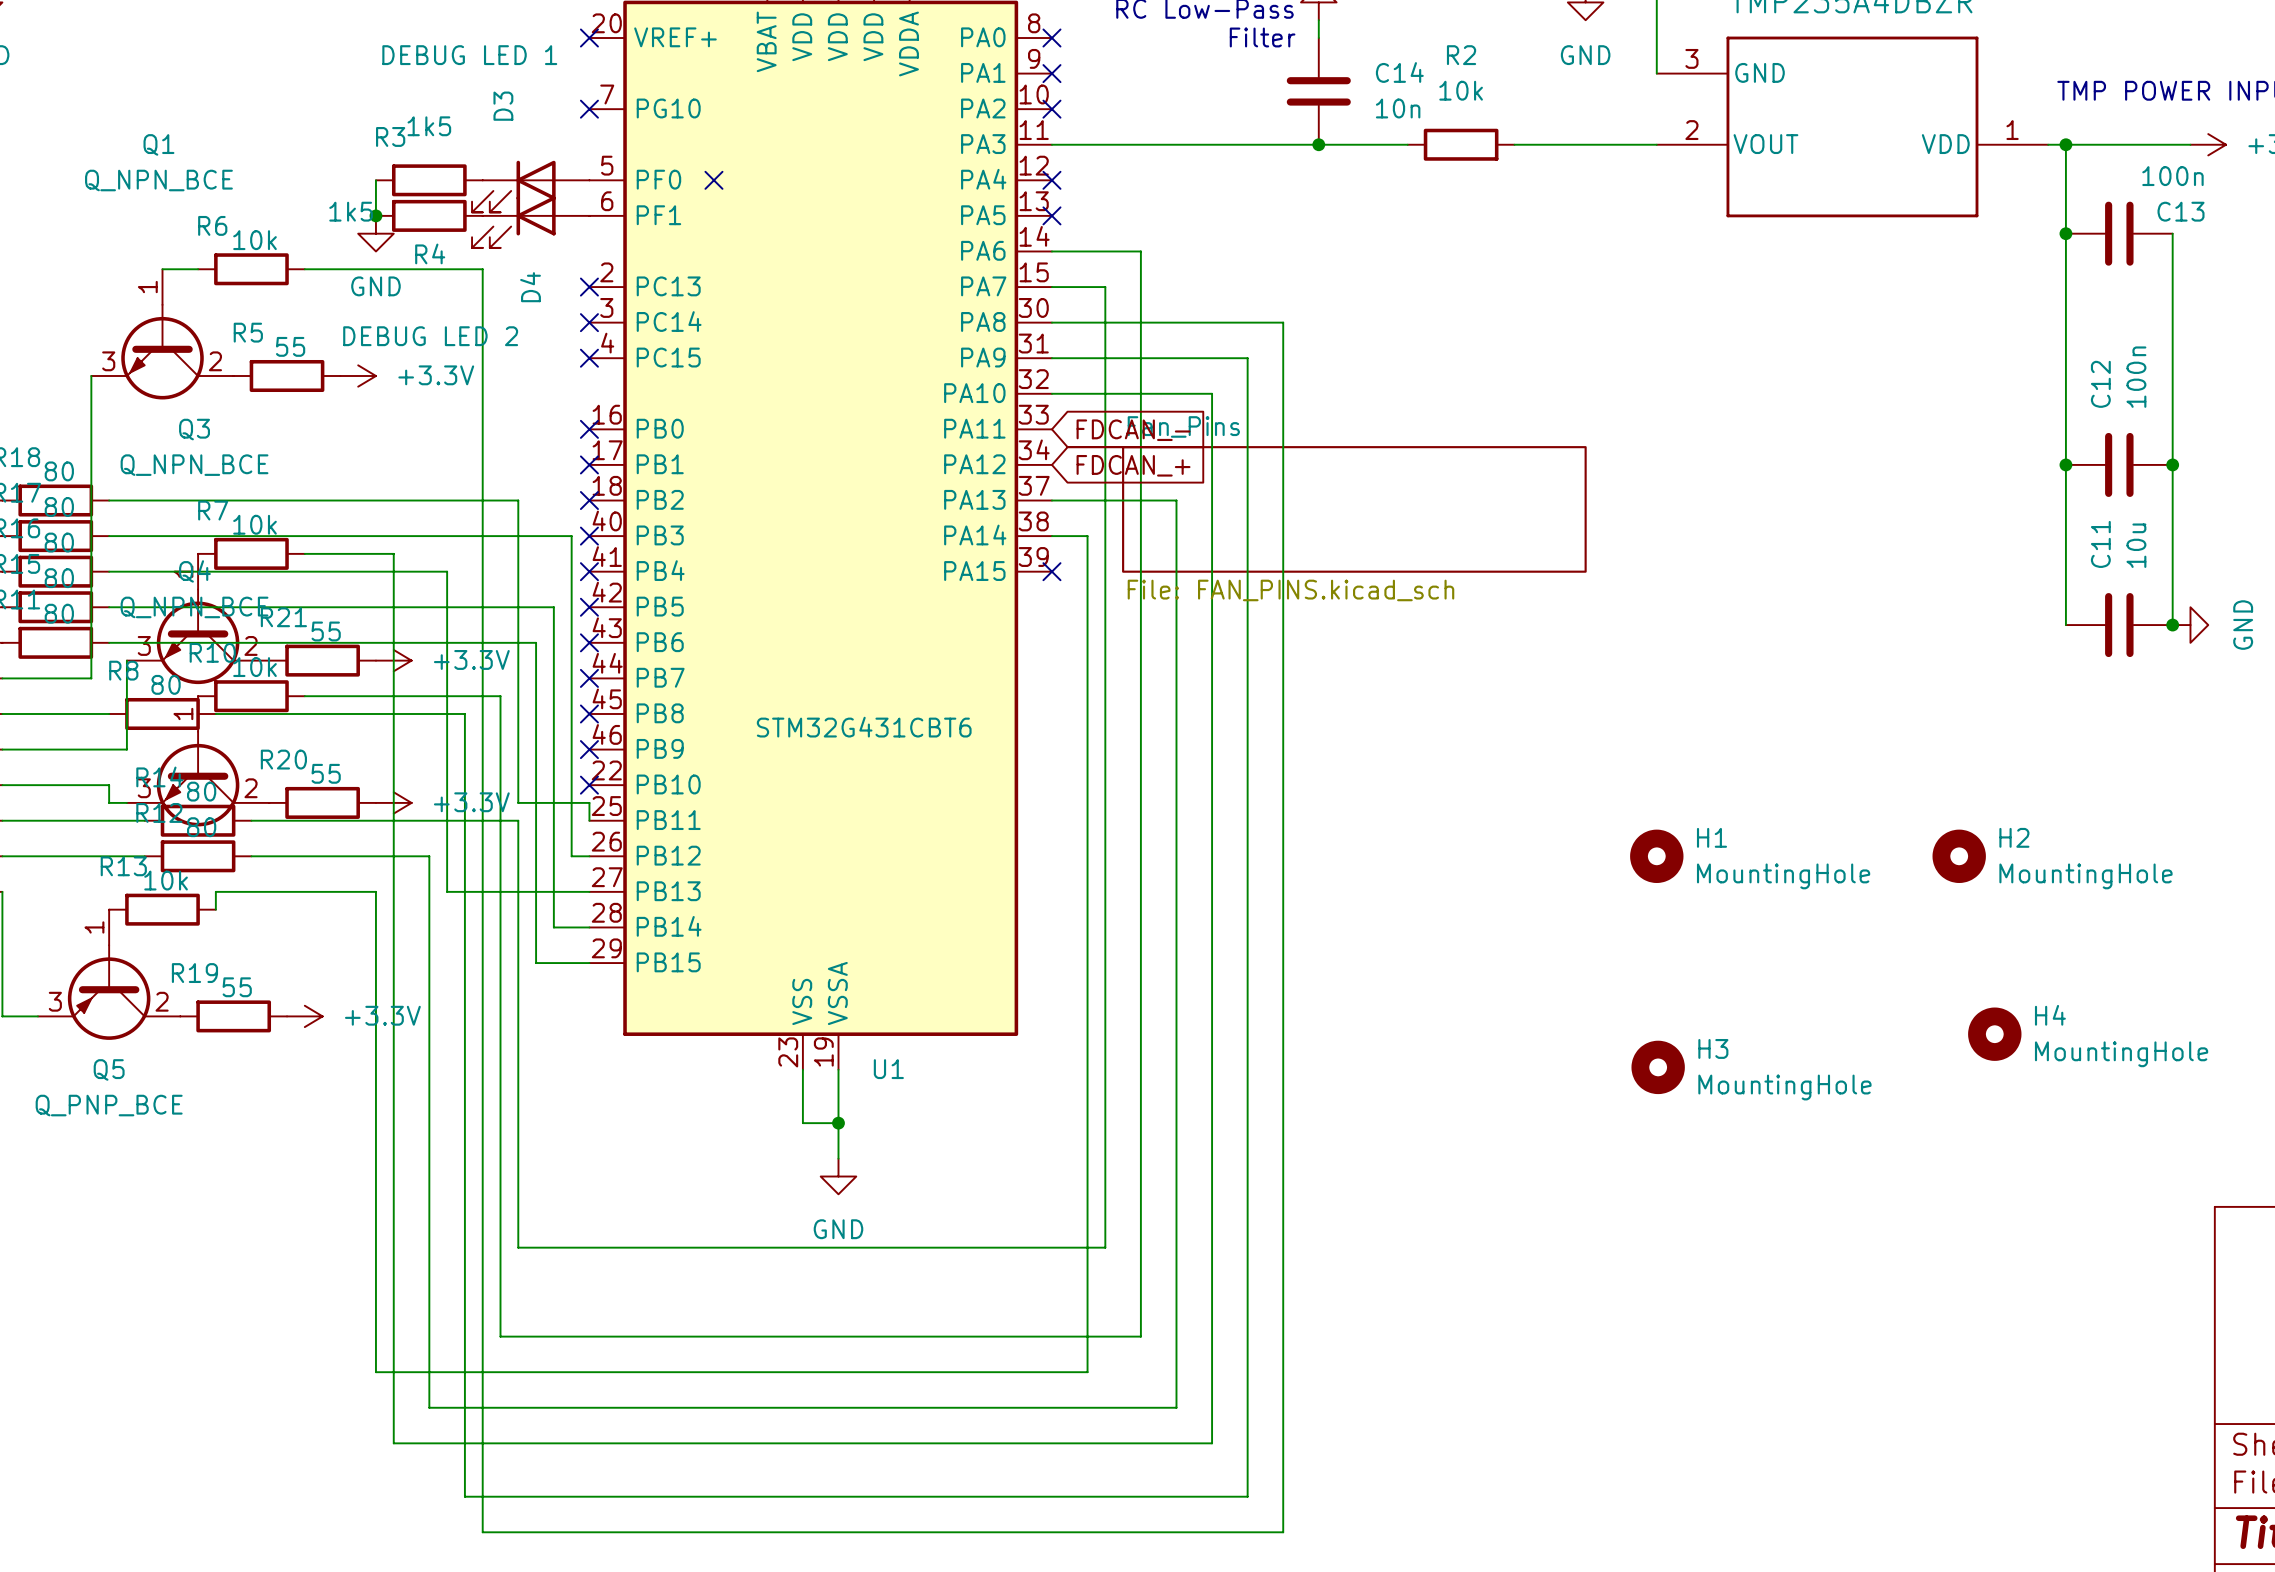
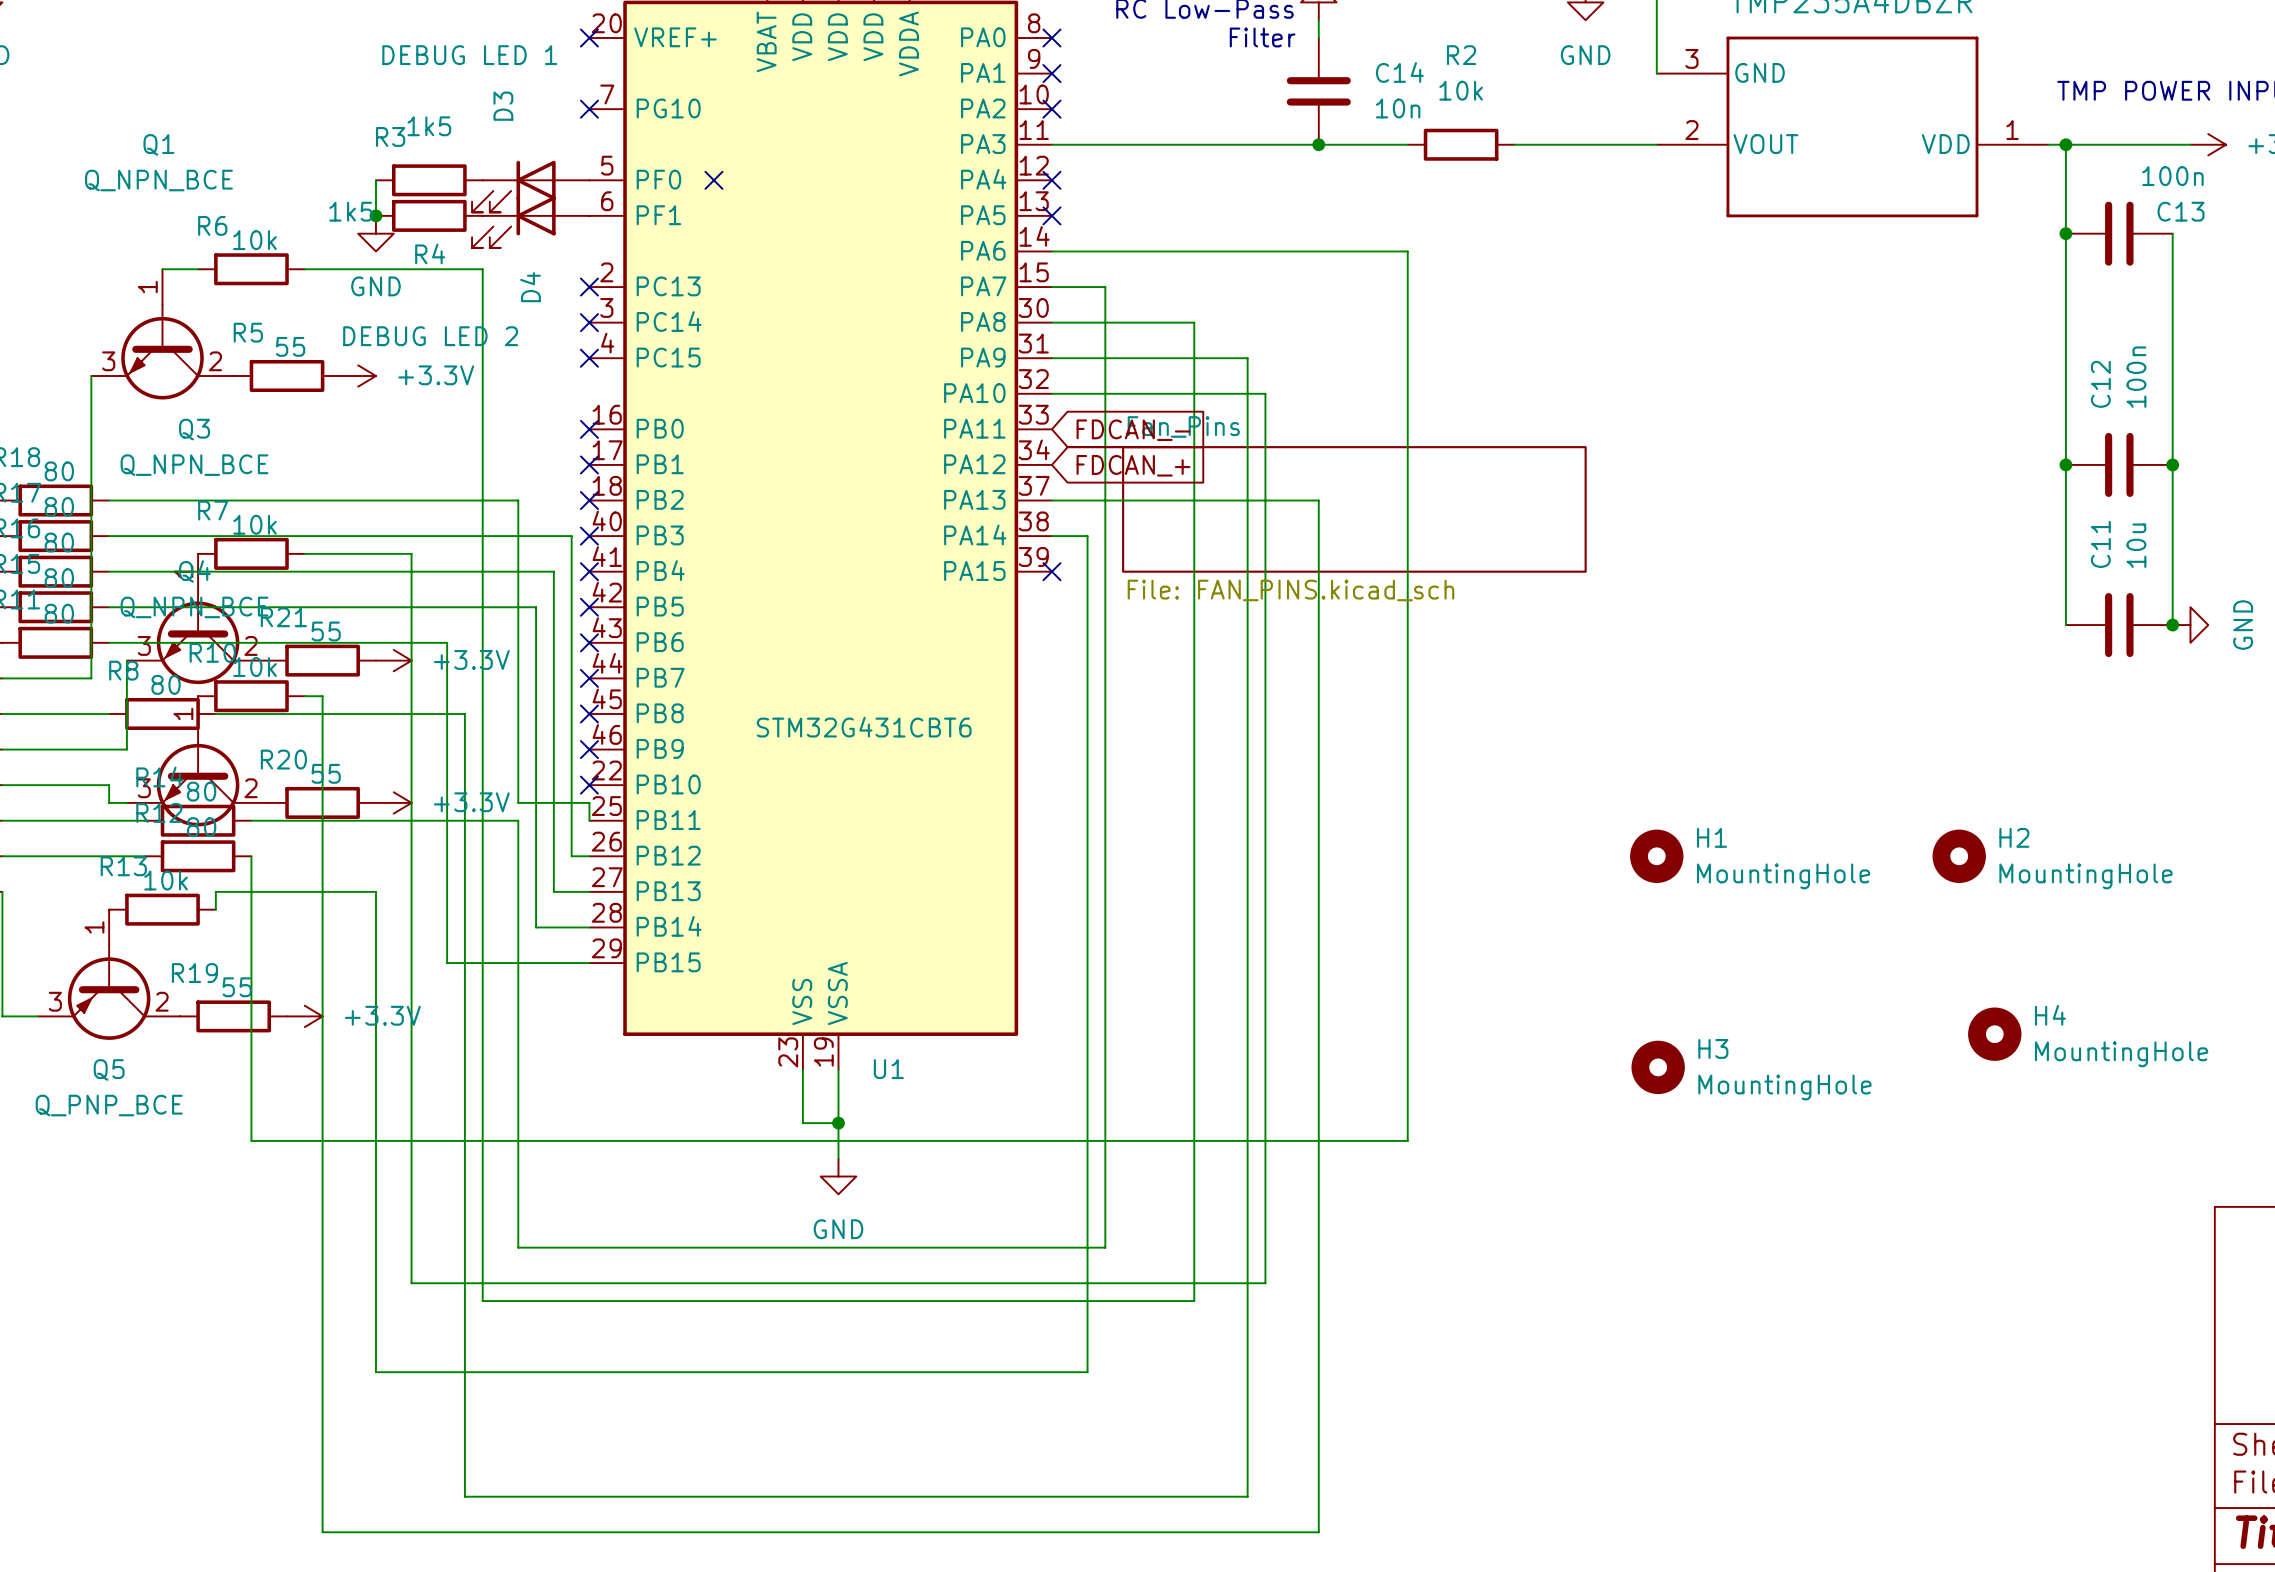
wire: (1140, 251) (1140, 1336) (500, 1336) (500, 696) (322, 696) -> (1140, 251) (1407, 251) (1407, 1140) (251, 1140) (251, 856)
wire: (1194, 322) (1283, 322) (1283, 1532) -> (1176, 500) (1318, 500) (1318, 1532) (1283, 1532)
wire: none -> (1194, 322) (1194, 1301) (482, 1301)
wire: (1212, 393) (1212, 1443) (393, 1443) (393, 553) -> (1212, 393) (1265, 393) (1265, 1283) (411, 1283) (411, 553) (393, 553)
wire: (1176, 500) (1176, 1407) (429, 1407) (429, 856) (251, 856) -> none
wire: (447, 571) (447, 642) (536, 642) -> (447, 571) (553, 571) (553, 607)
wire: (536, 607) (553, 607) -> (536, 607) (536, 642)
wire: (447, 891) (553, 891) (553, 927) -> (447, 891) (447, 963) (536, 963)
wire: (536, 927) (536, 963) -> (536, 927) (553, 927)
wire: (482, 1301) (482, 1532) -> (322, 696) (322, 1532) (482, 1532)

